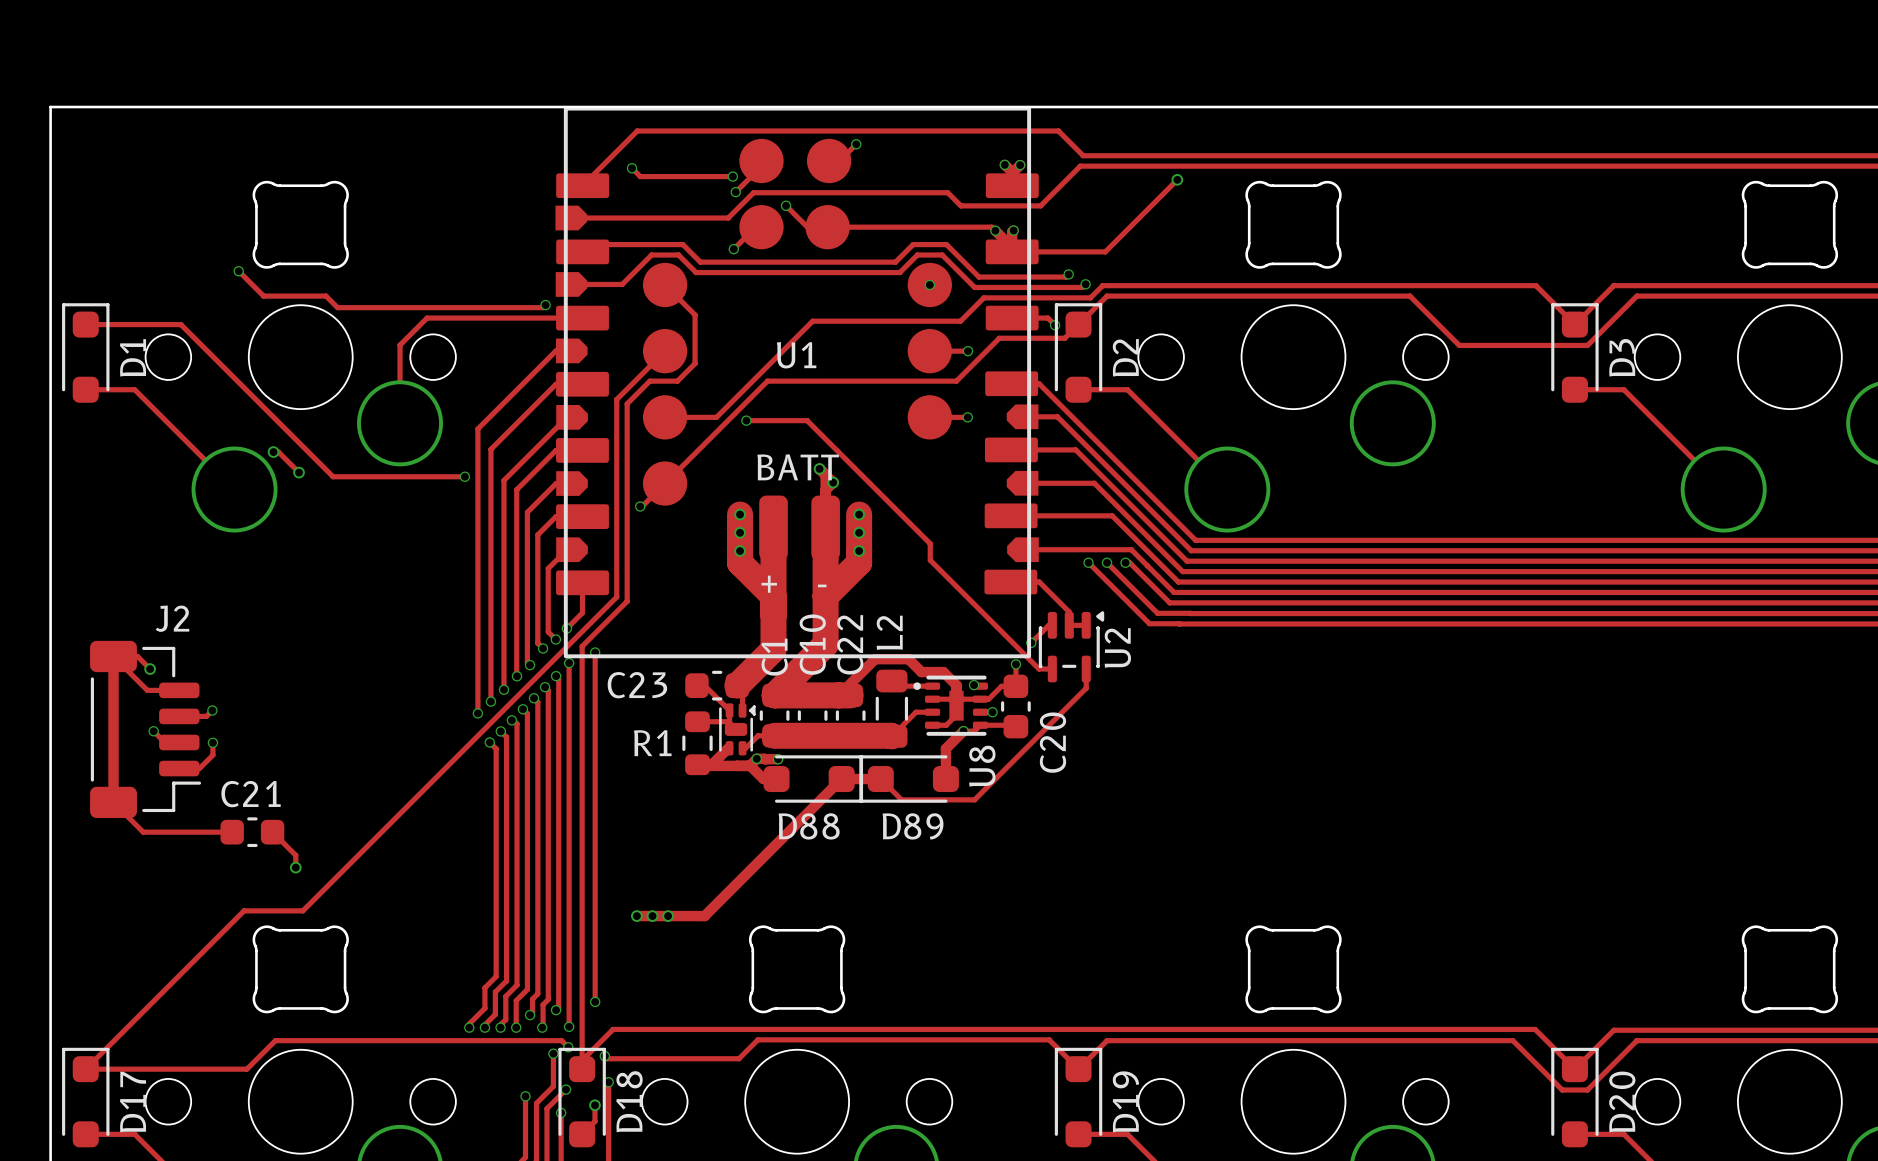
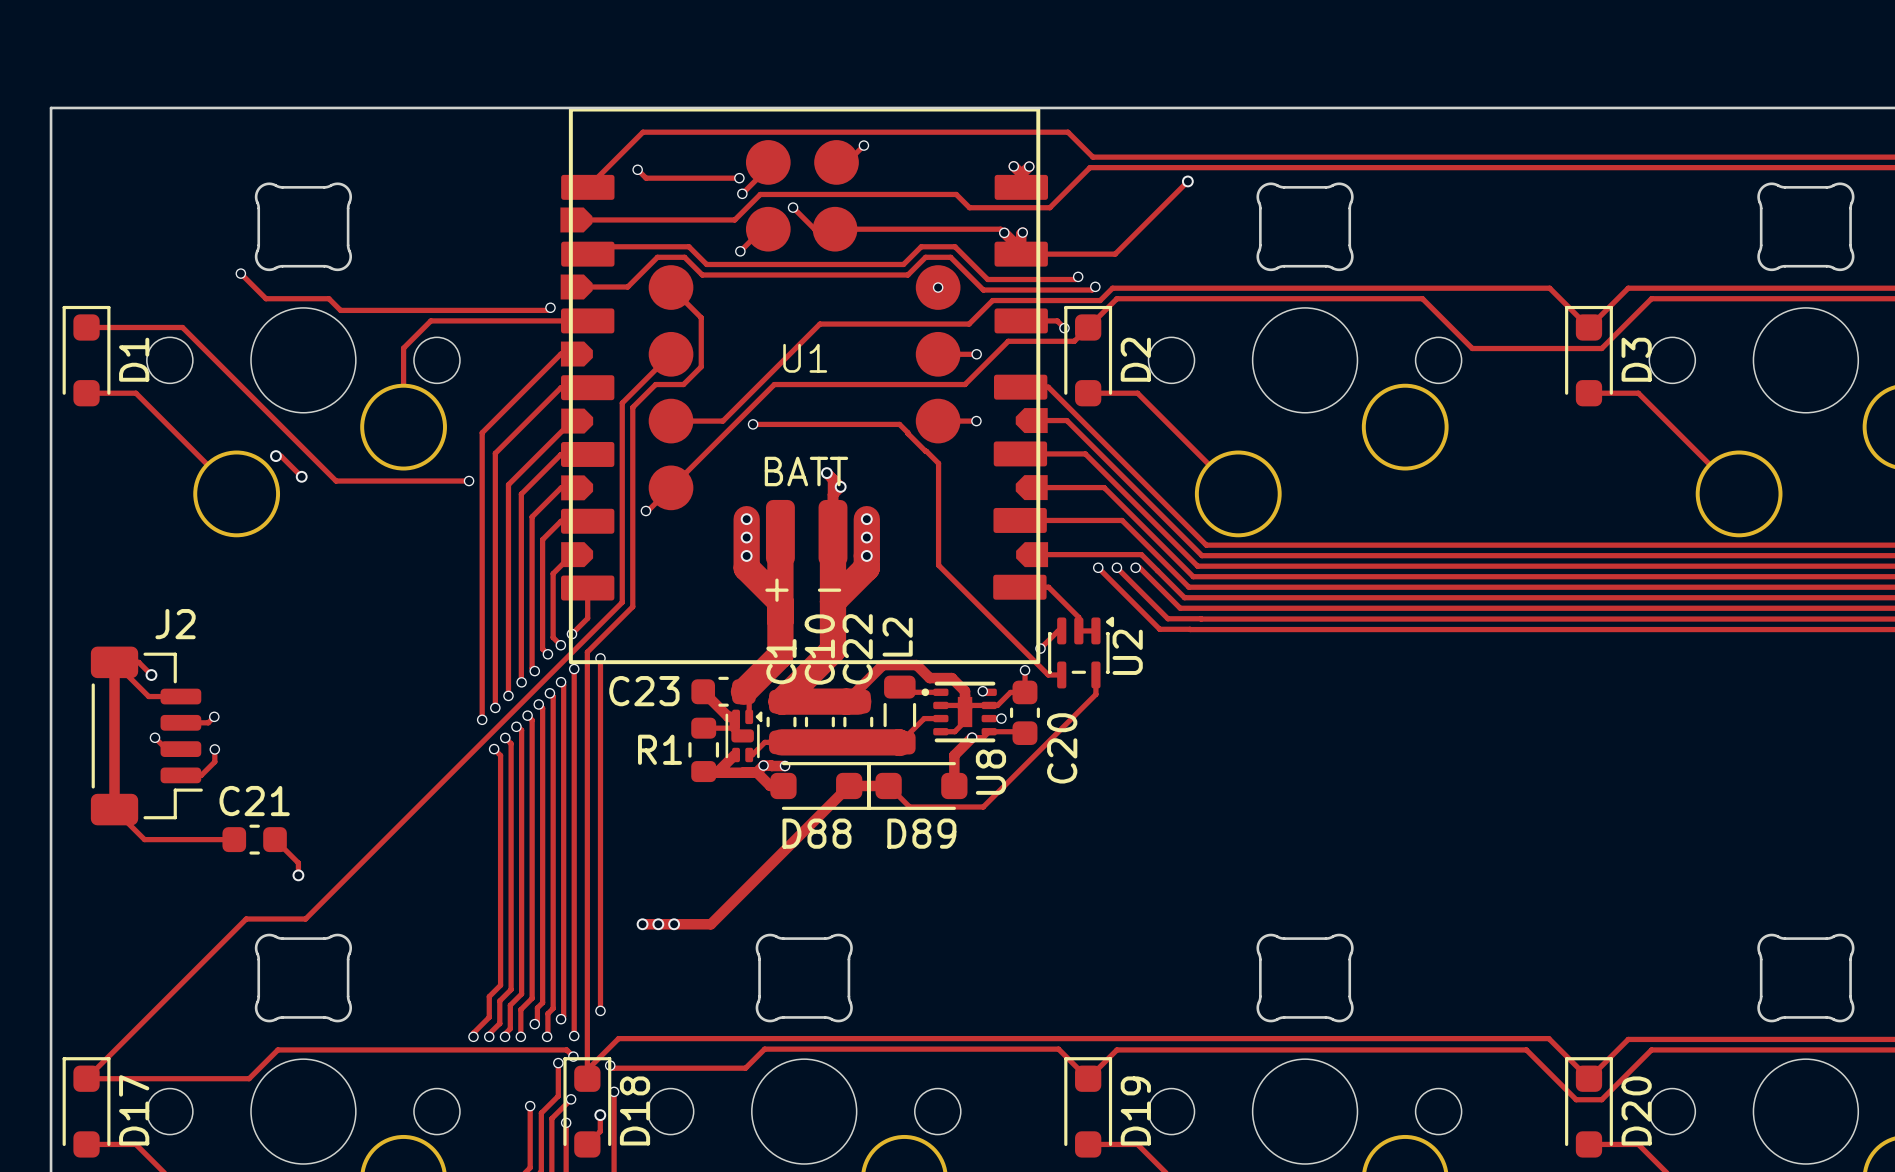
track: (807, 420) (930, 543) -> (814, 424) (899, 424) (907, 432) (938, 463) (938, 548)
track: none -> (703, 691) (728, 716) (734, 716) (734, 728)
track: (704, 685) (729, 710) (729, 722) -> none

